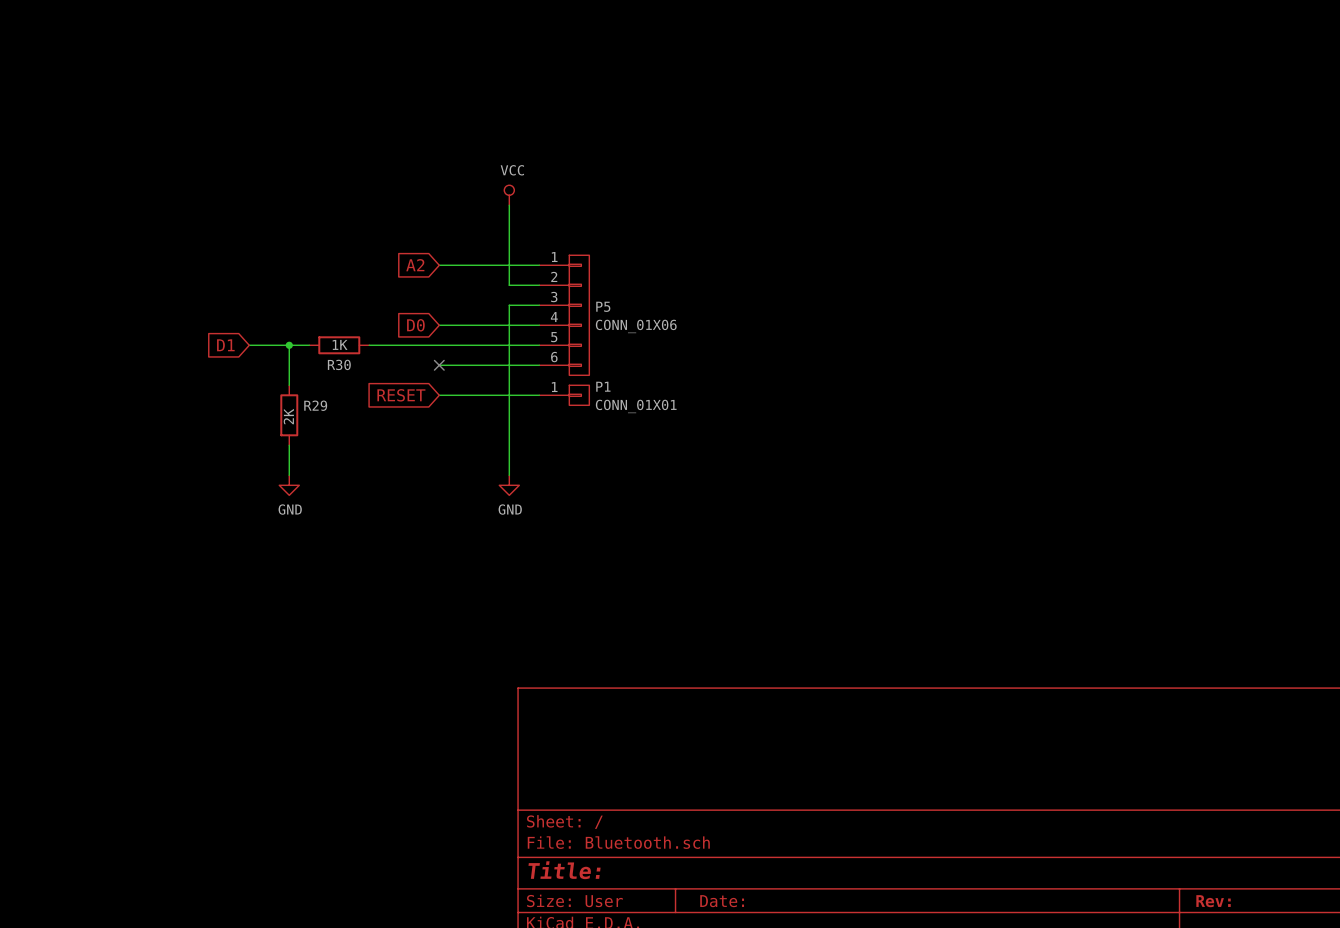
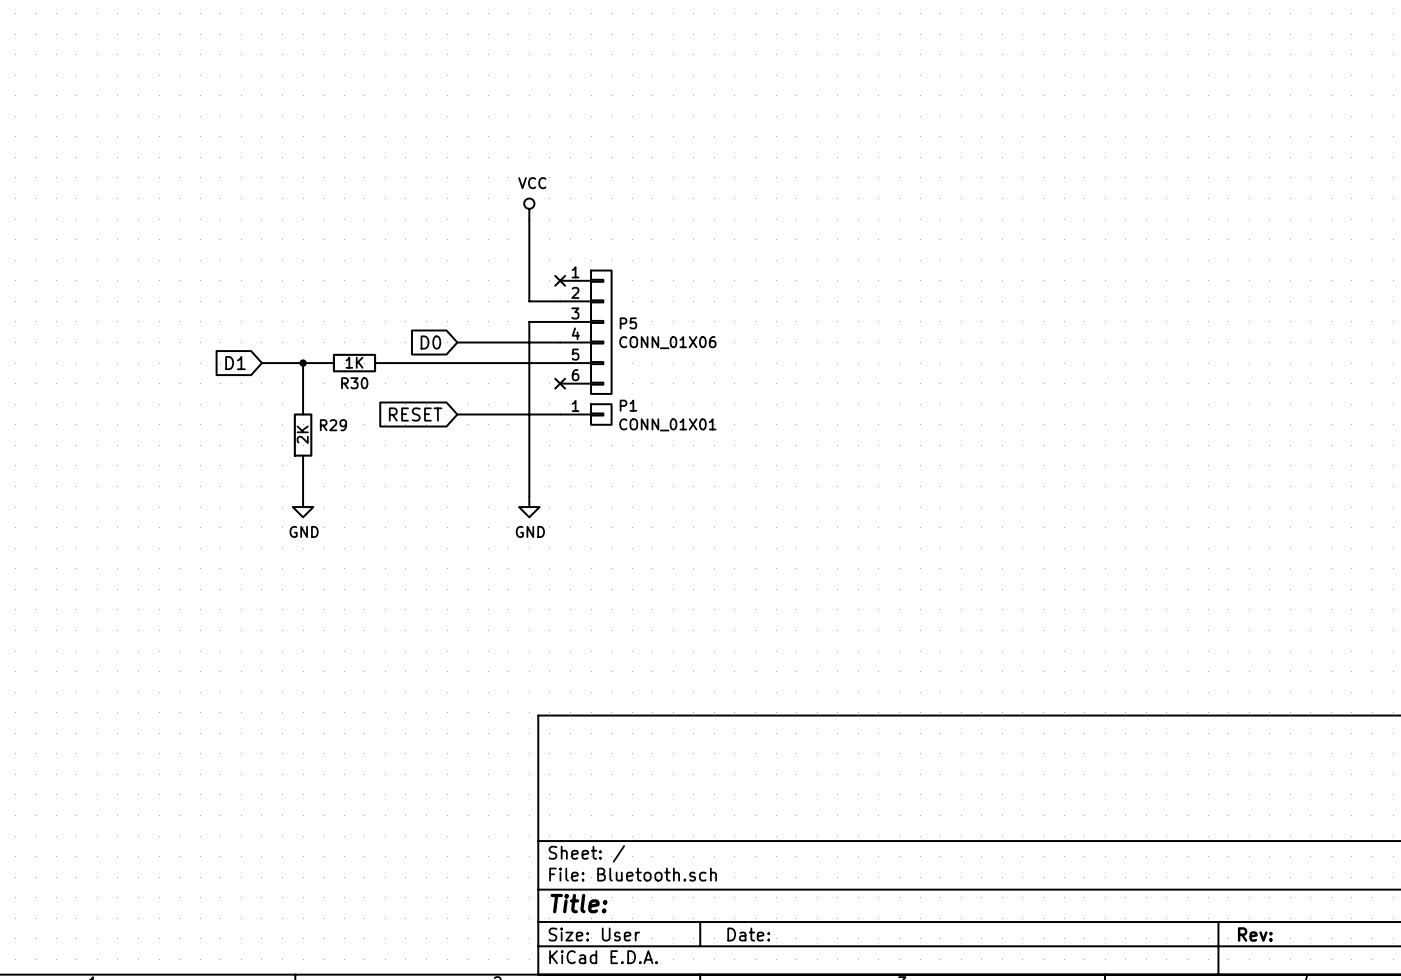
global label: A2 (415, 265) -> none
wire: (439, 265) (539, 265) -> none
no-connect mark: none -> (560, 280)
wire: (439, 365) (539, 365) -> none
no-connect mark: (439, 365) -> none
no-connect mark: none -> (560, 383)

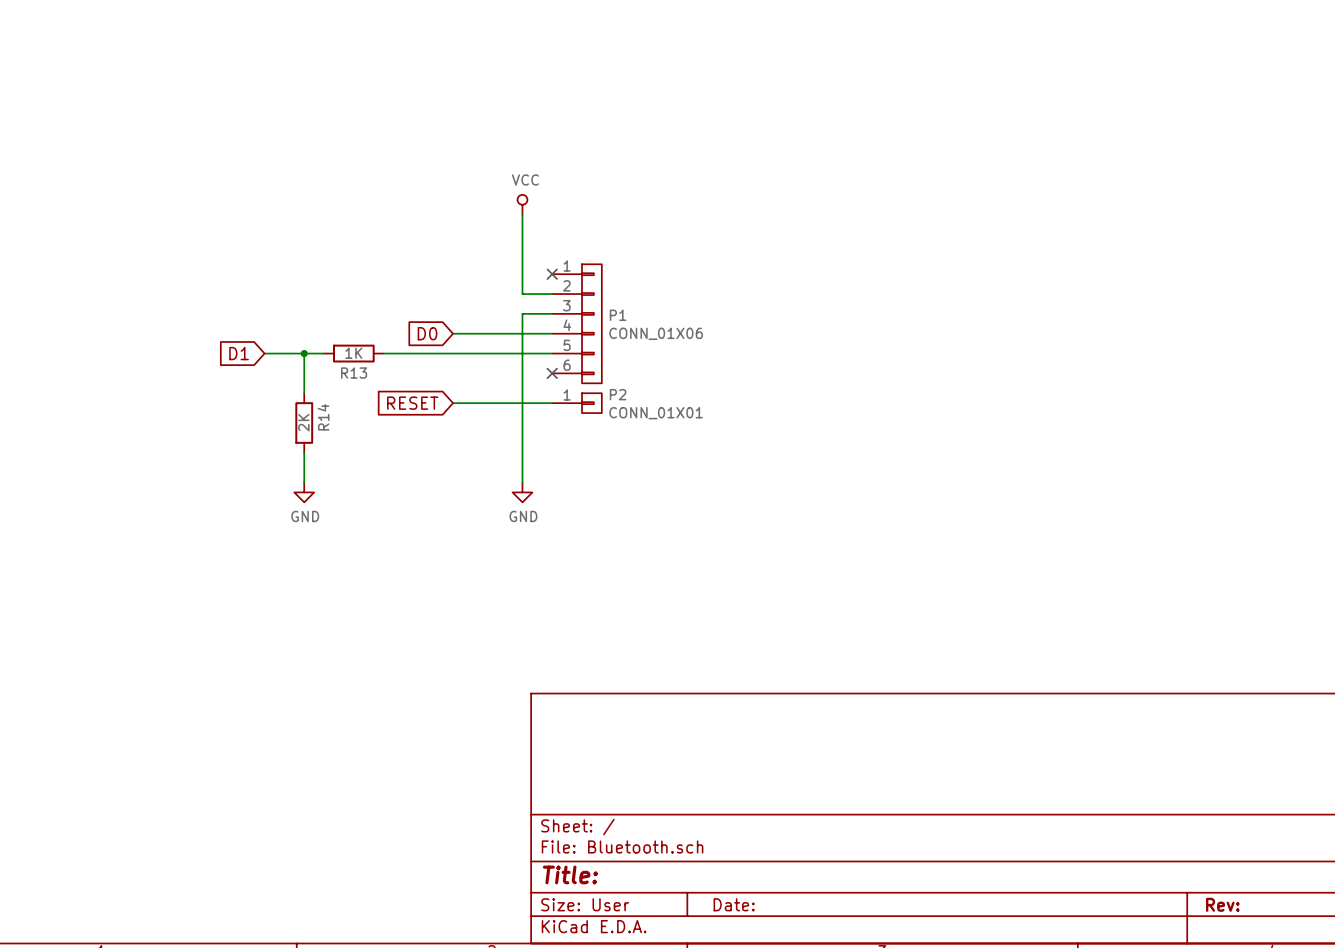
P5 name: P5 (628, 323) -> P1 (618, 315)
R30 name: R30 (354, 383) -> R13 (354, 373)
P1 name: P1 (628, 405) -> P2 (618, 394)
R29 name: R29 (333, 425) -> R14 (323, 417)

